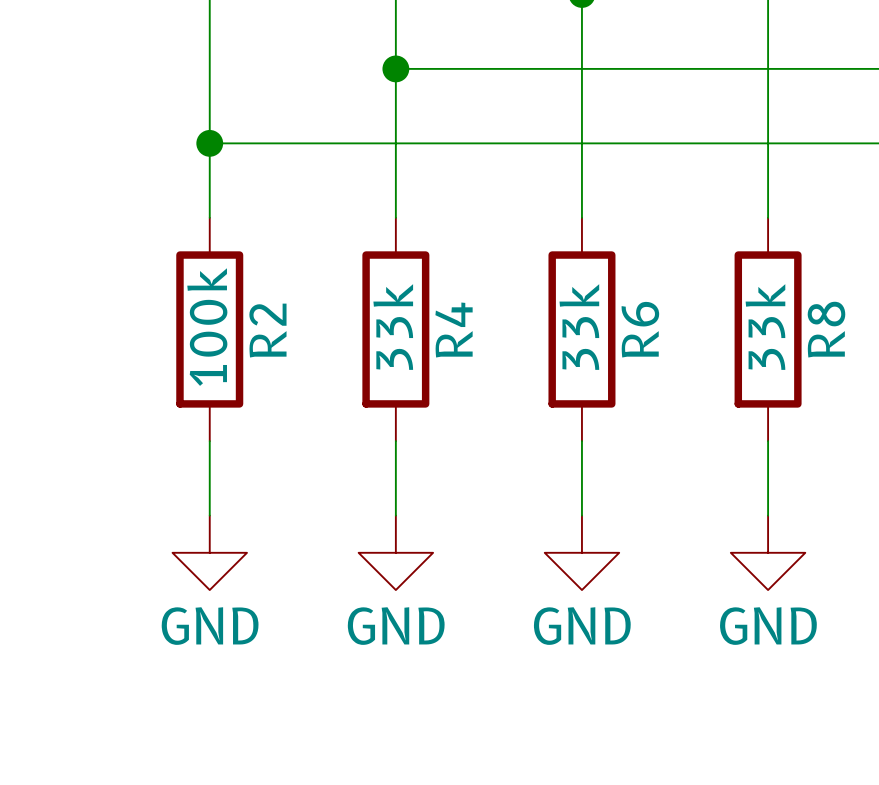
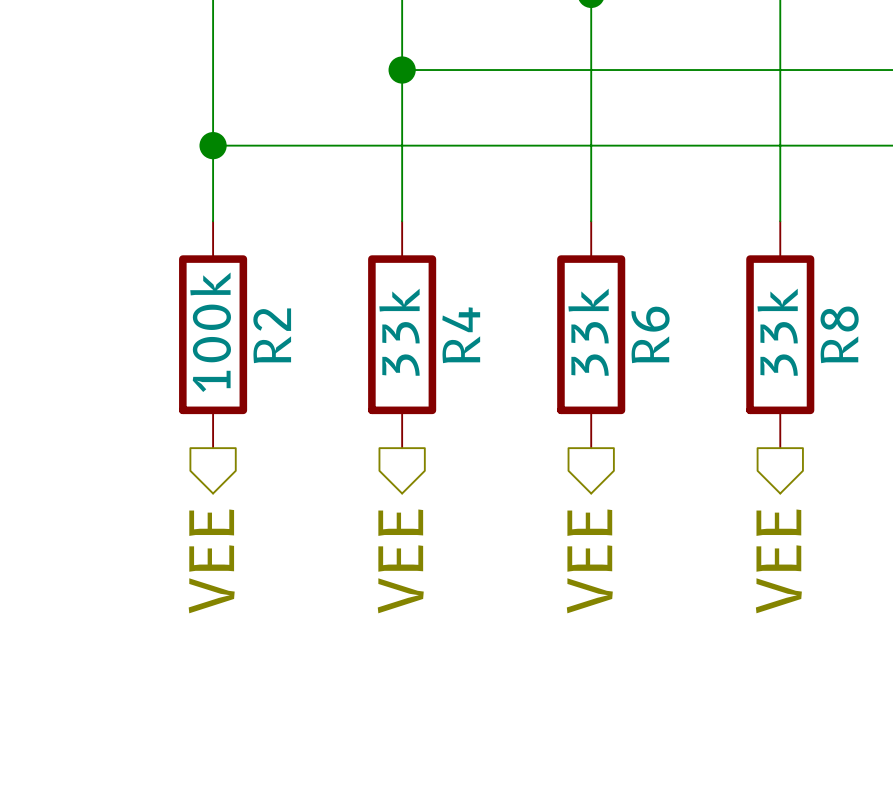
wire: (209, 441) (209, 515) -> none
wire: (395, 441) (395, 515) -> none
wire: (581, 441) (581, 515) -> none
wire: (768, 441) (768, 515) -> none
hierarchical label: none -> VEE (211, 561)
power symbol: GND (209, 552) -> none
hierarchical label: none -> VEE (400, 561)
power symbol: GND (395, 552) -> none
hierarchical label: none -> VEE (589, 561)
power symbol: GND (581, 552) -> none
hierarchical label: none -> VEE (778, 561)
power symbol: GND (768, 552) -> none

